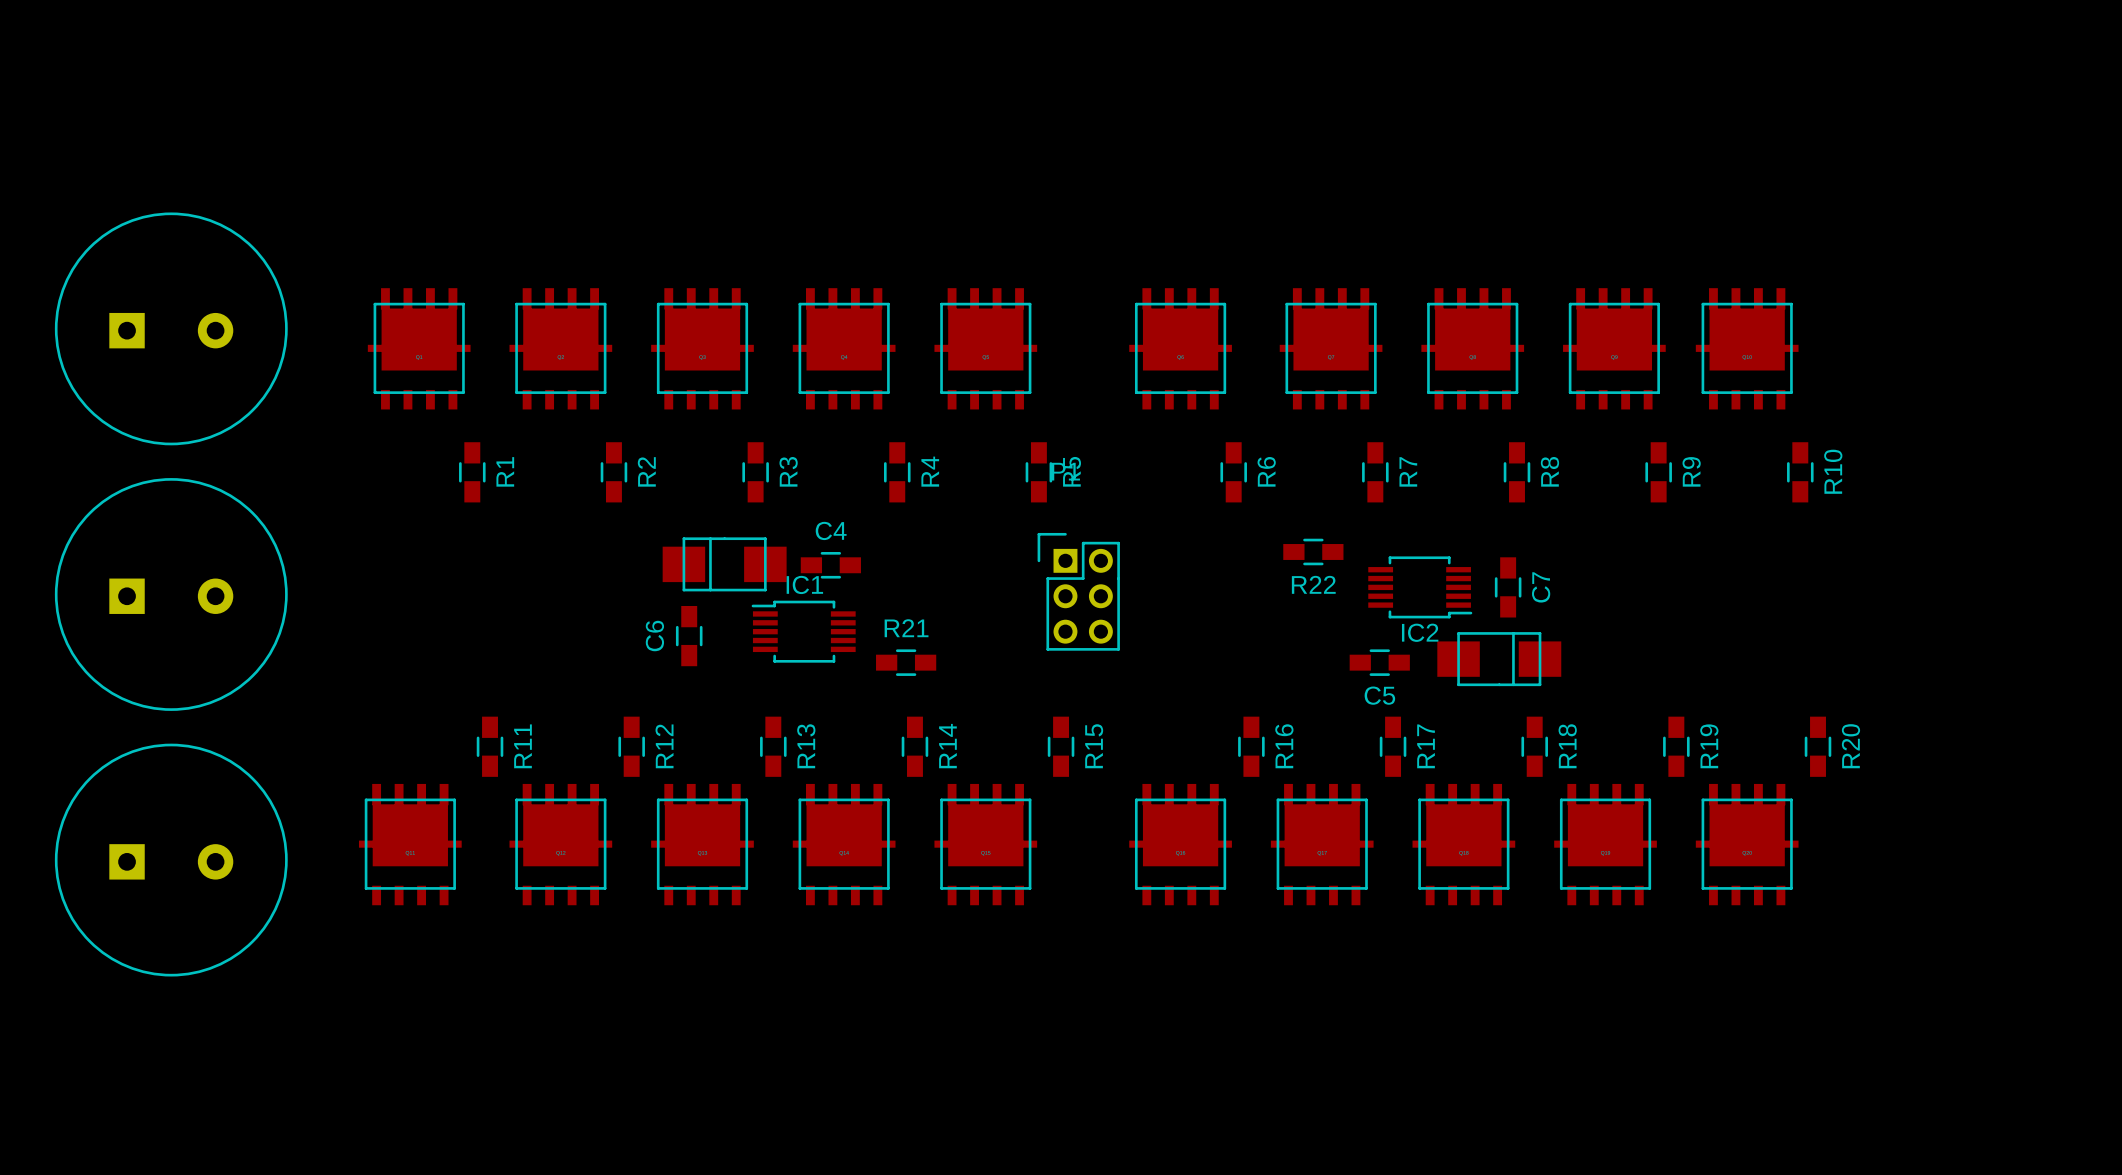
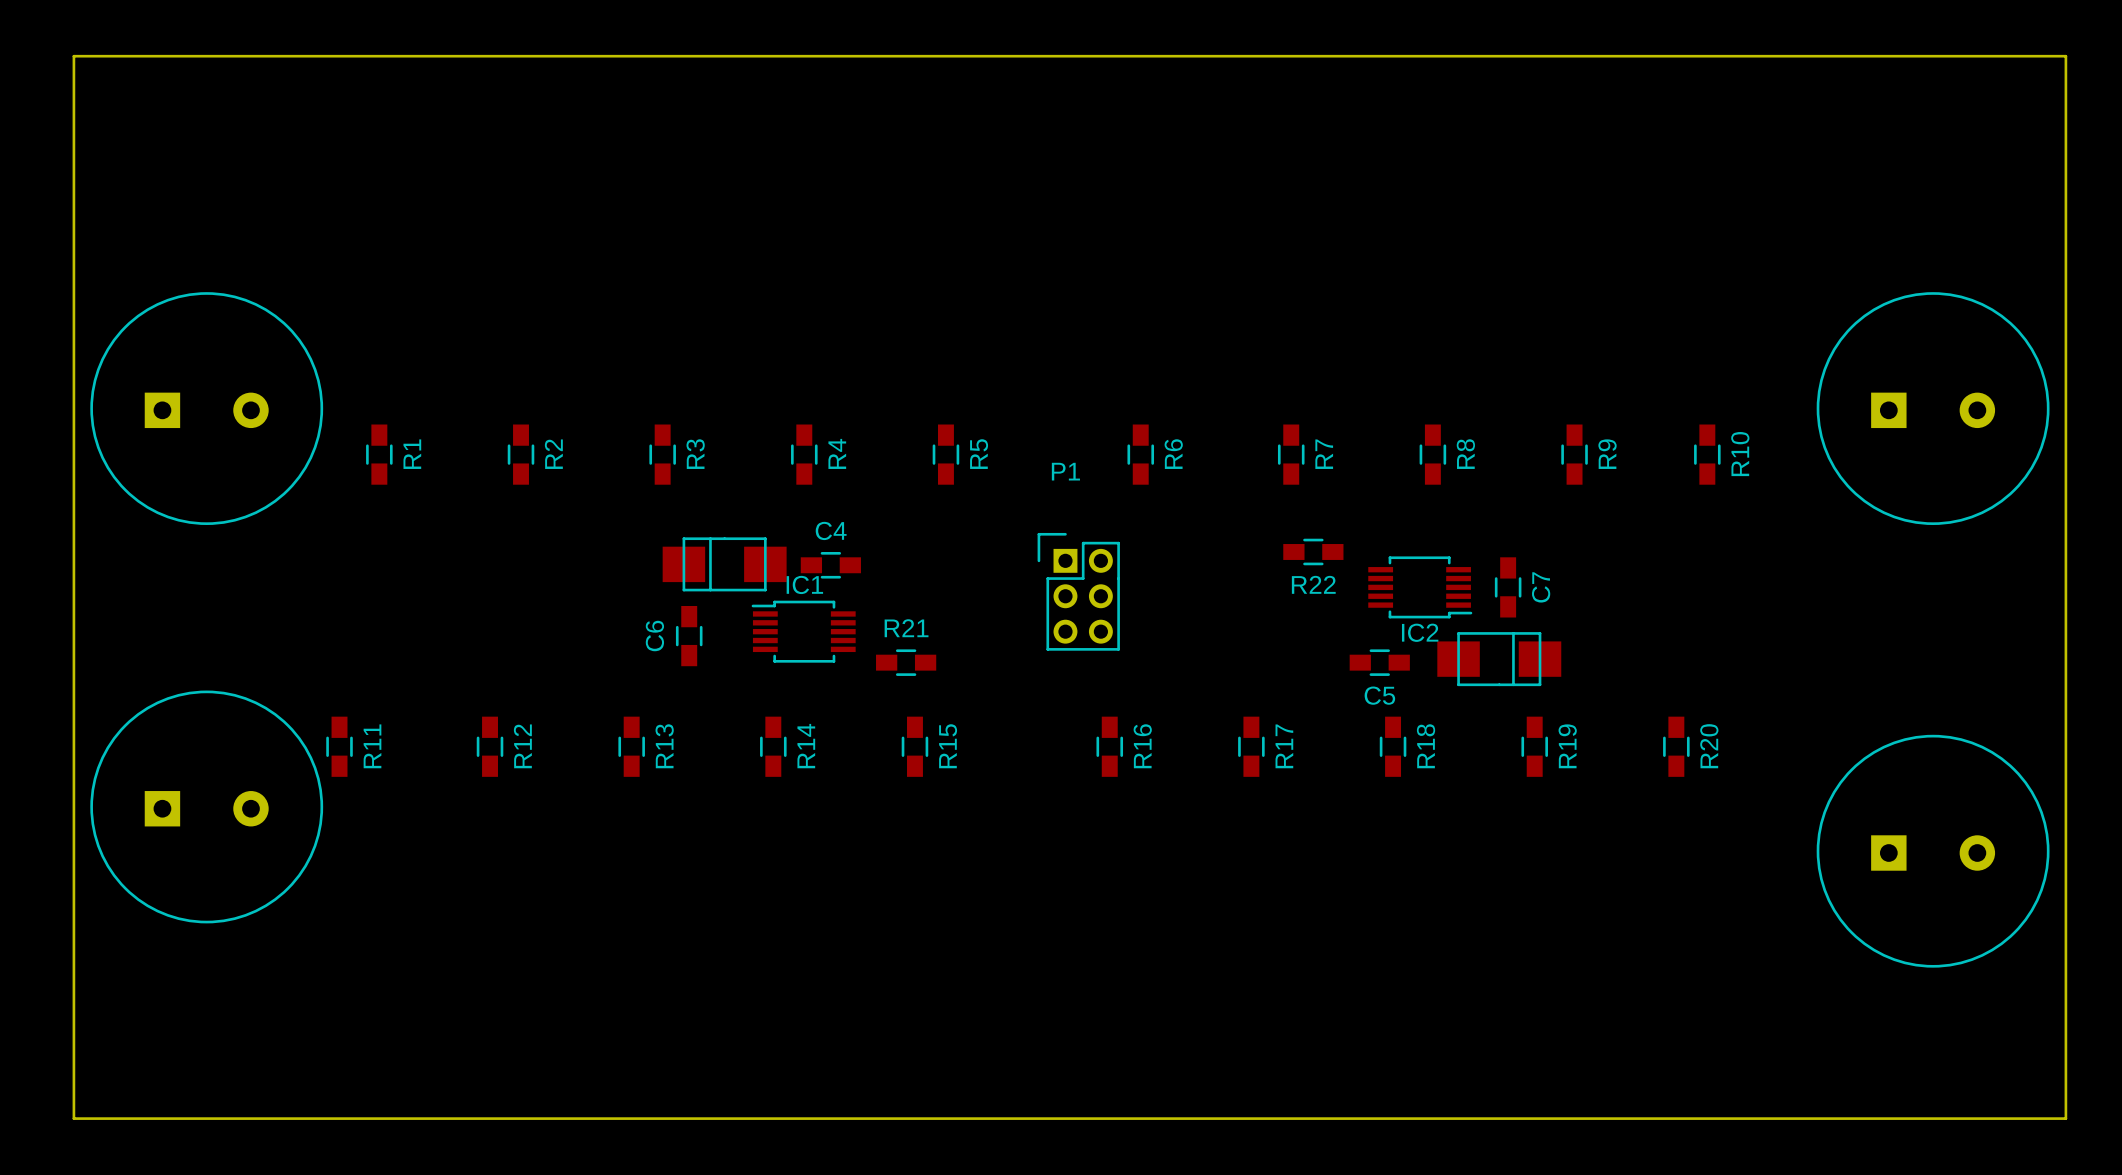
board edge: none -> (73, 56) (73, 1118) (2065, 1118) (2065, 56) (73, 56)
part position: (171, 328) -> (206, 408)
part: (419, 348) -> none
part: (560, 348) -> none
part: (702, 348) -> none
part: (844, 348) -> none
part: (985, 348) -> none
part: (1180, 348) -> none
part: (1331, 348) -> none
part: (1472, 348) -> none
part: (1614, 348) -> none
part: (1747, 348) -> none
part: none -> (1933, 408)
R1 position: (472, 472) -> (379, 454)
R2 position: (613, 472) -> (521, 454)
R3 position: (755, 472) -> (662, 454)
R4 position: (897, 472) -> (804, 454)
R5 position: (1038, 472) -> (945, 454)
R6 position: (1233, 472) -> (1140, 454)
R7 position: (1375, 472) -> (1291, 454)
R8 position: (1517, 472) -> (1432, 454)
R9 position: (1658, 472) -> (1574, 454)
R10 position: (1800, 472) -> (1707, 454)
part: (171, 594) -> none
R11: none -> (339, 746)
R11 name: R11 (523, 746) -> R12 (522, 746)
R12 name: R12 (664, 746) -> R13 (664, 746)
R13 name: R13 (806, 746) -> R14 (806, 746)
R14 name: R14 (947, 746) -> R15 (948, 746)
R15: (1061, 746) -> none
R16: none -> (1109, 746)
R16 name: R16 (1284, 746) -> R17 (1284, 746)
R17 name: R17 (1426, 746) -> R18 (1426, 746)
R18 name: R18 (1567, 746) -> R19 (1567, 746)
R19 name: R19 (1709, 746) -> R20 (1709, 746)
R20: (1818, 746) -> none
part: (410, 844) -> none
part: (560, 844) -> none
part: (702, 844) -> none
part: (844, 844) -> none
part: (985, 844) -> none
part: (1180, 844) -> none
part: (1322, 844) -> none
part: (1463, 844) -> none
part: (1605, 844) -> none
part: (1747, 844) -> none
part: none -> (1933, 851)
part position: (171, 860) -> (206, 806)

